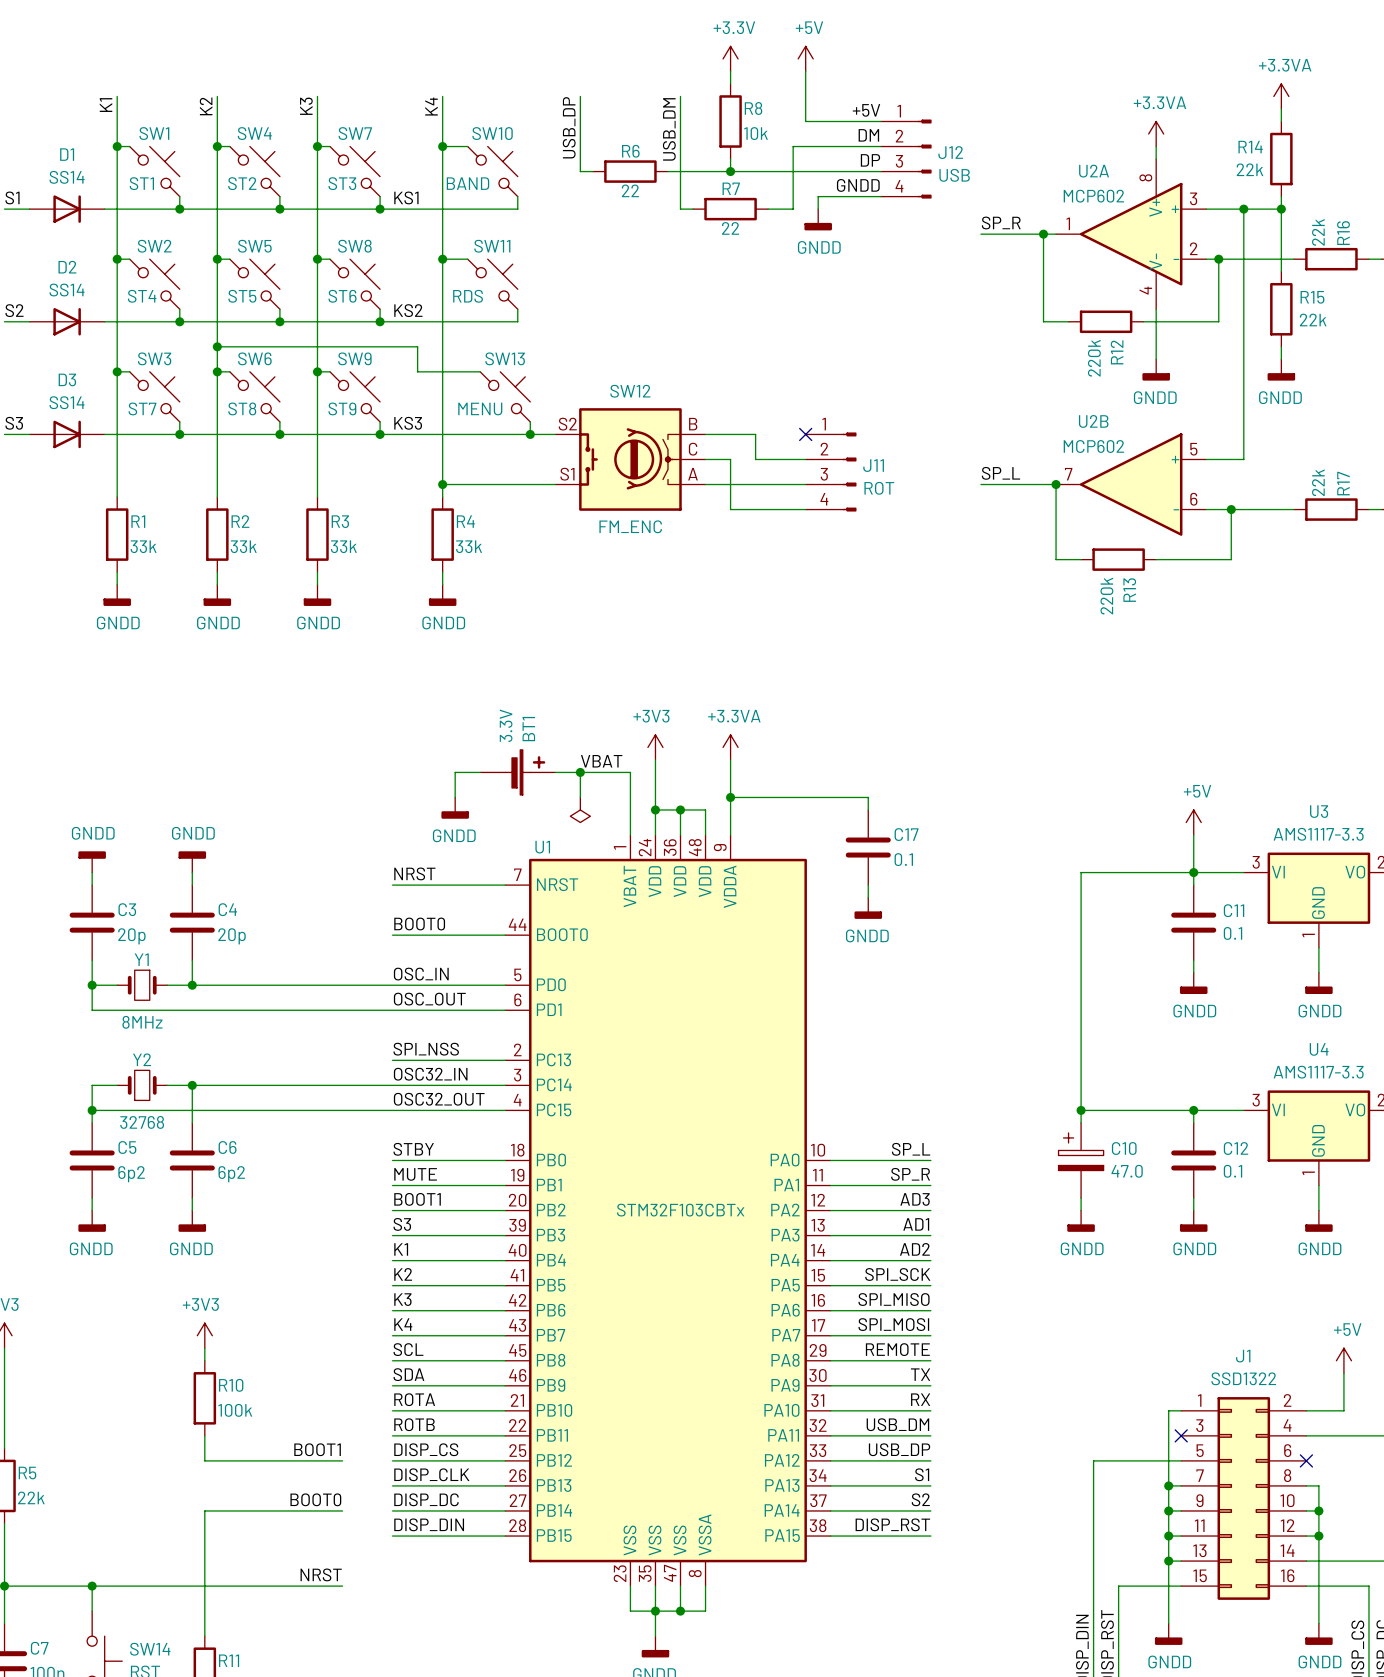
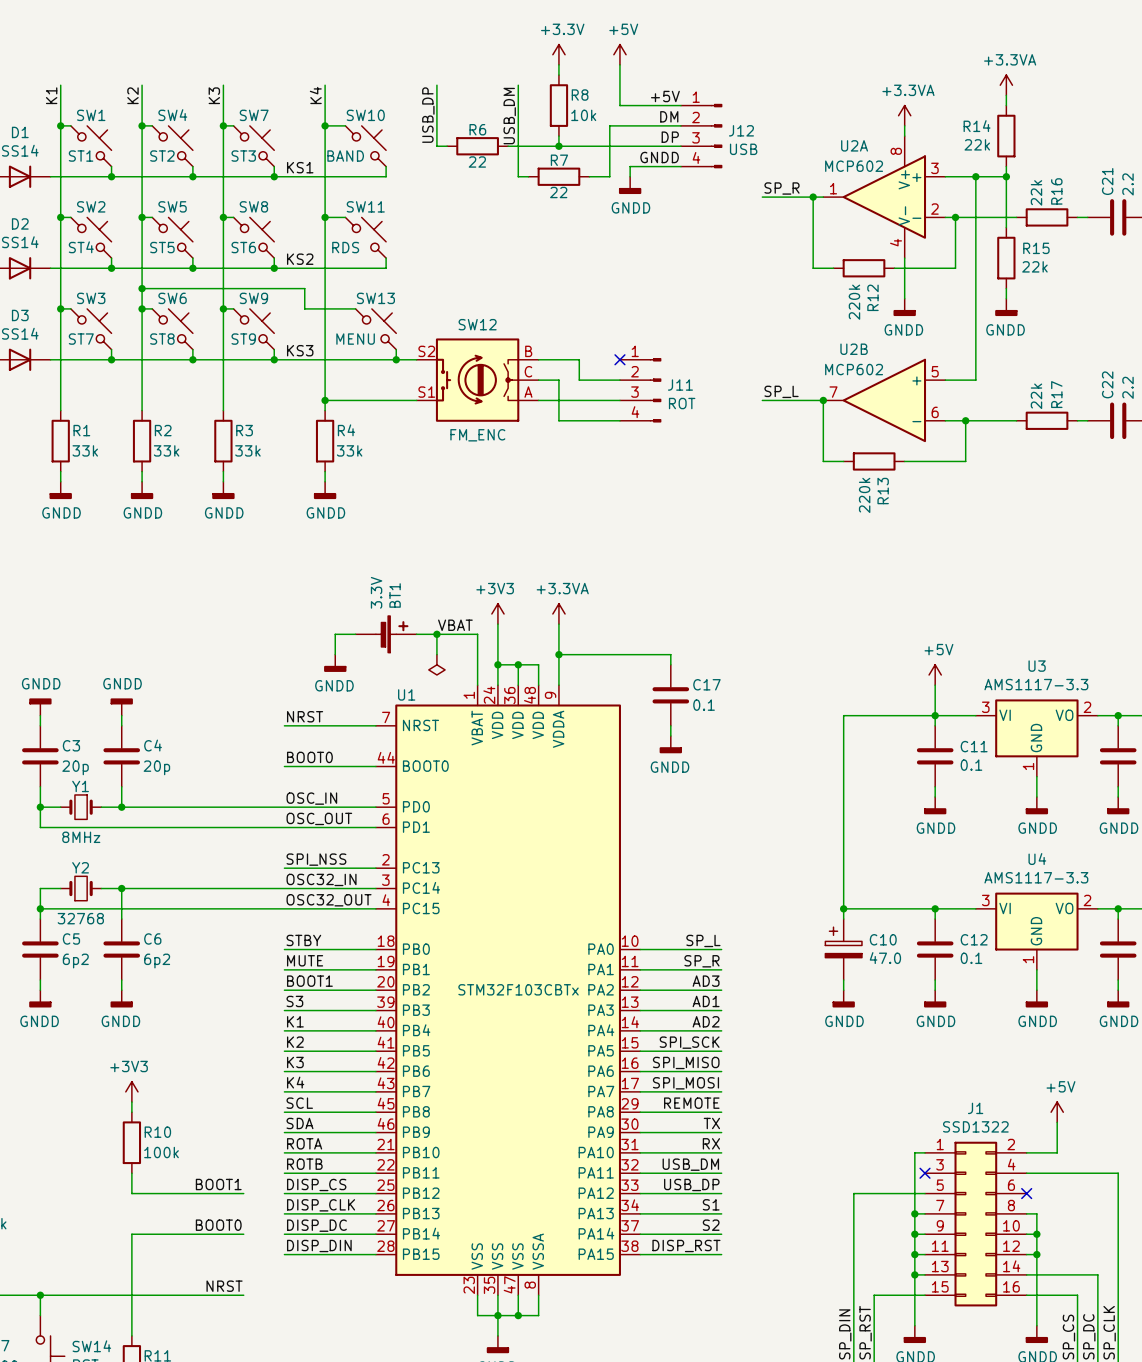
SW12 symbol: [555, 408, 706, 511] -> [416, 338, 539, 422]

